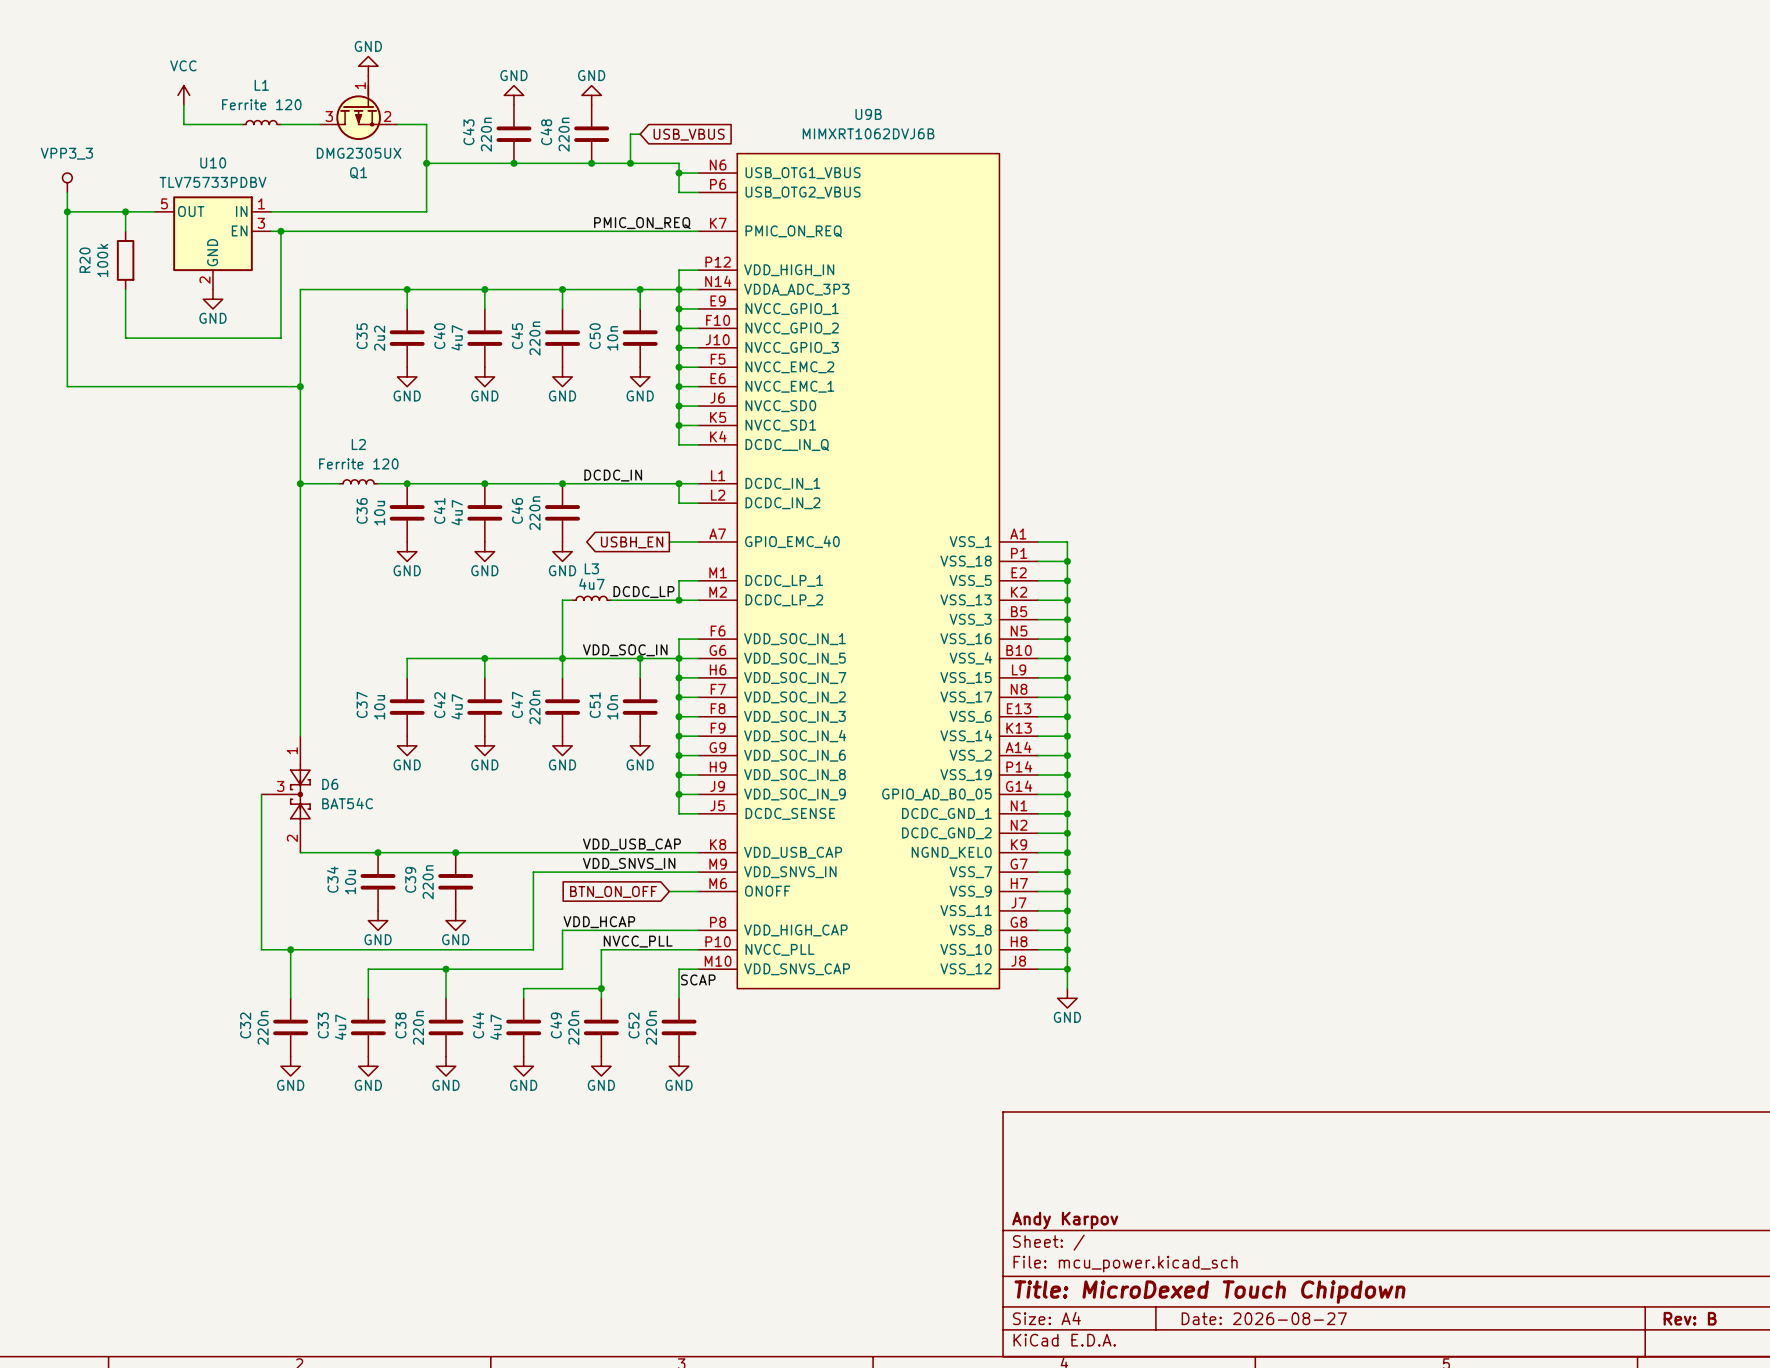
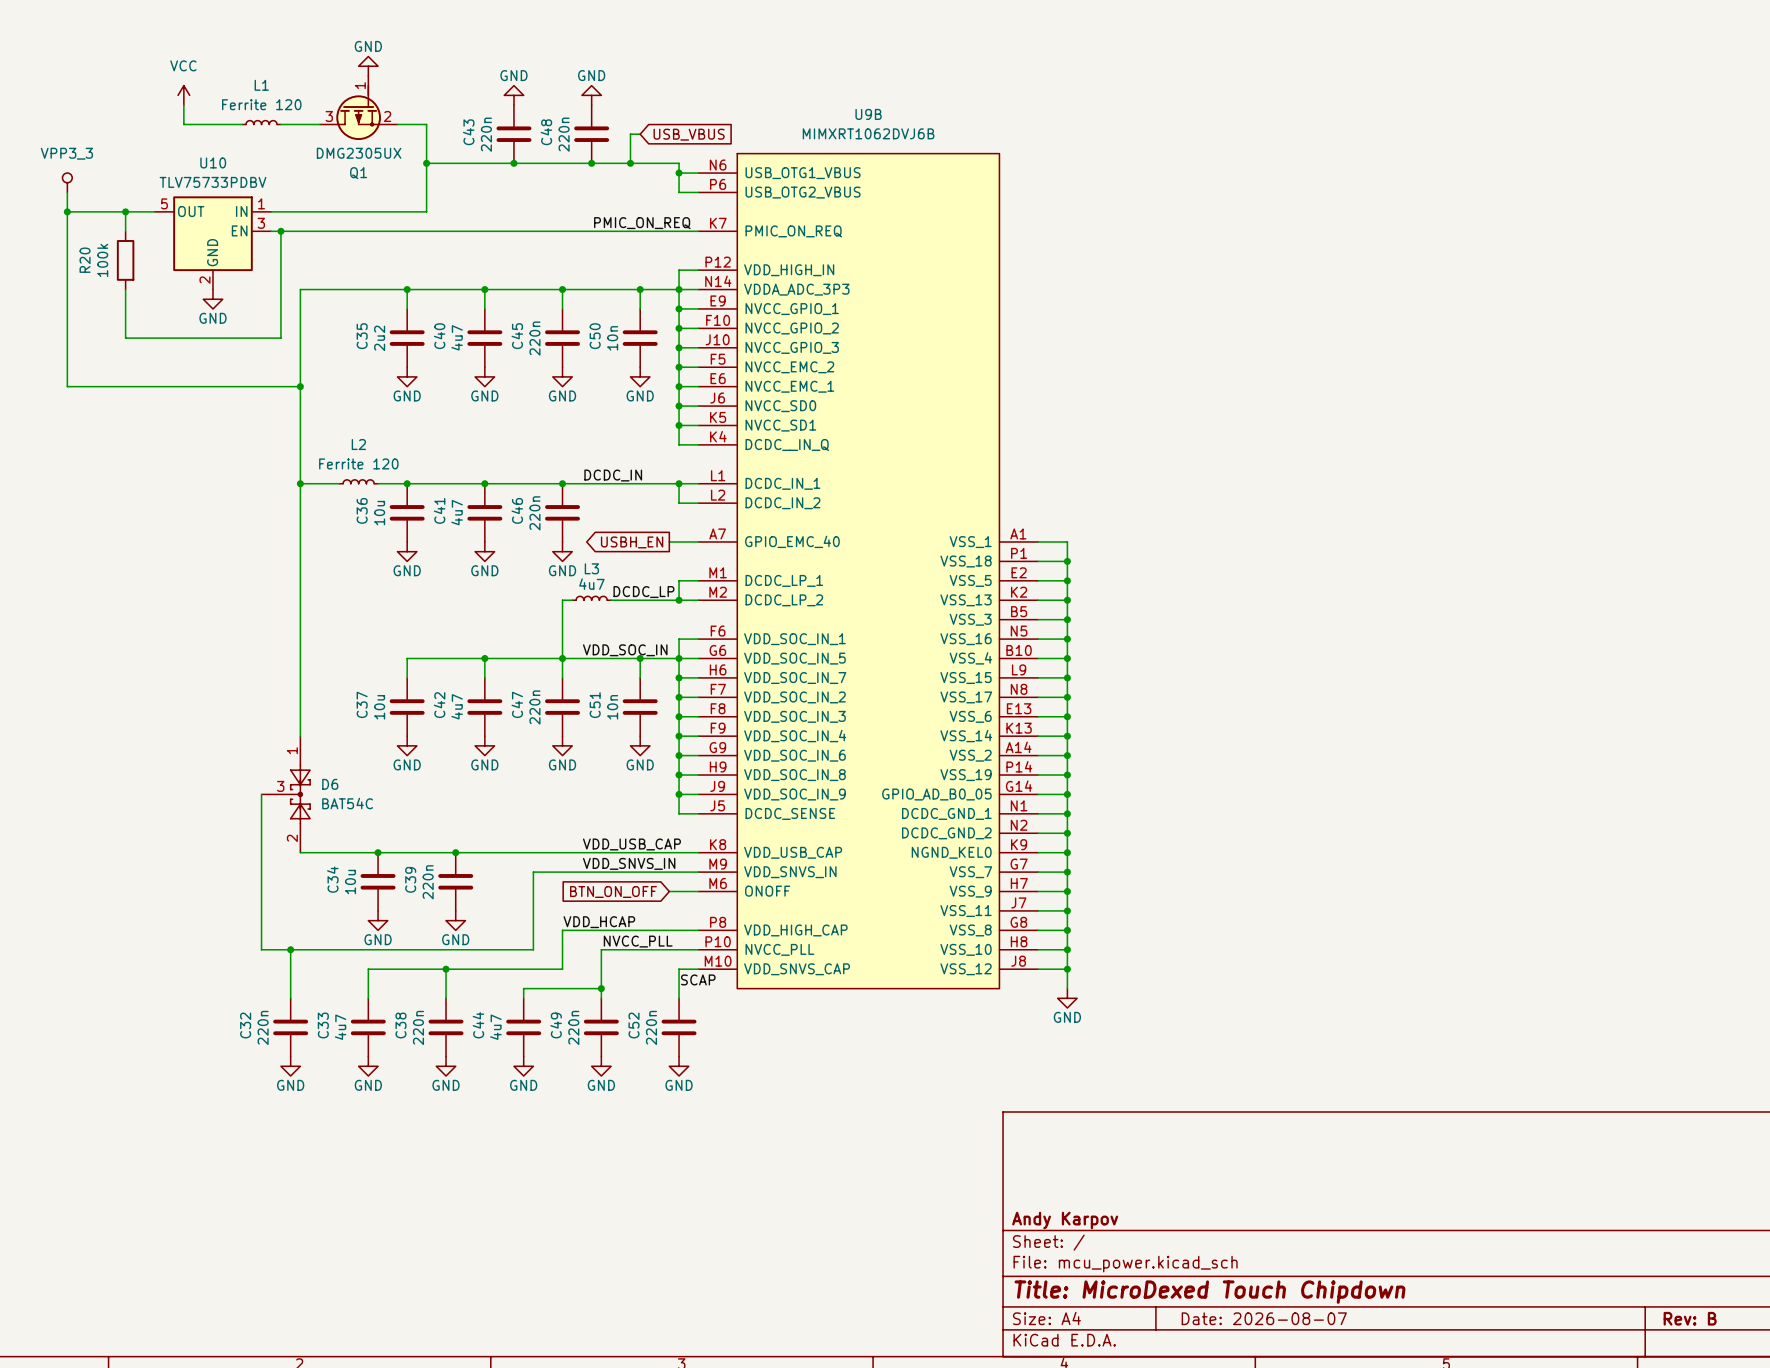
title block: Date: 2026-08-27 (1264, 1318) -> Date: 2026-08-07 (1264, 1318)

